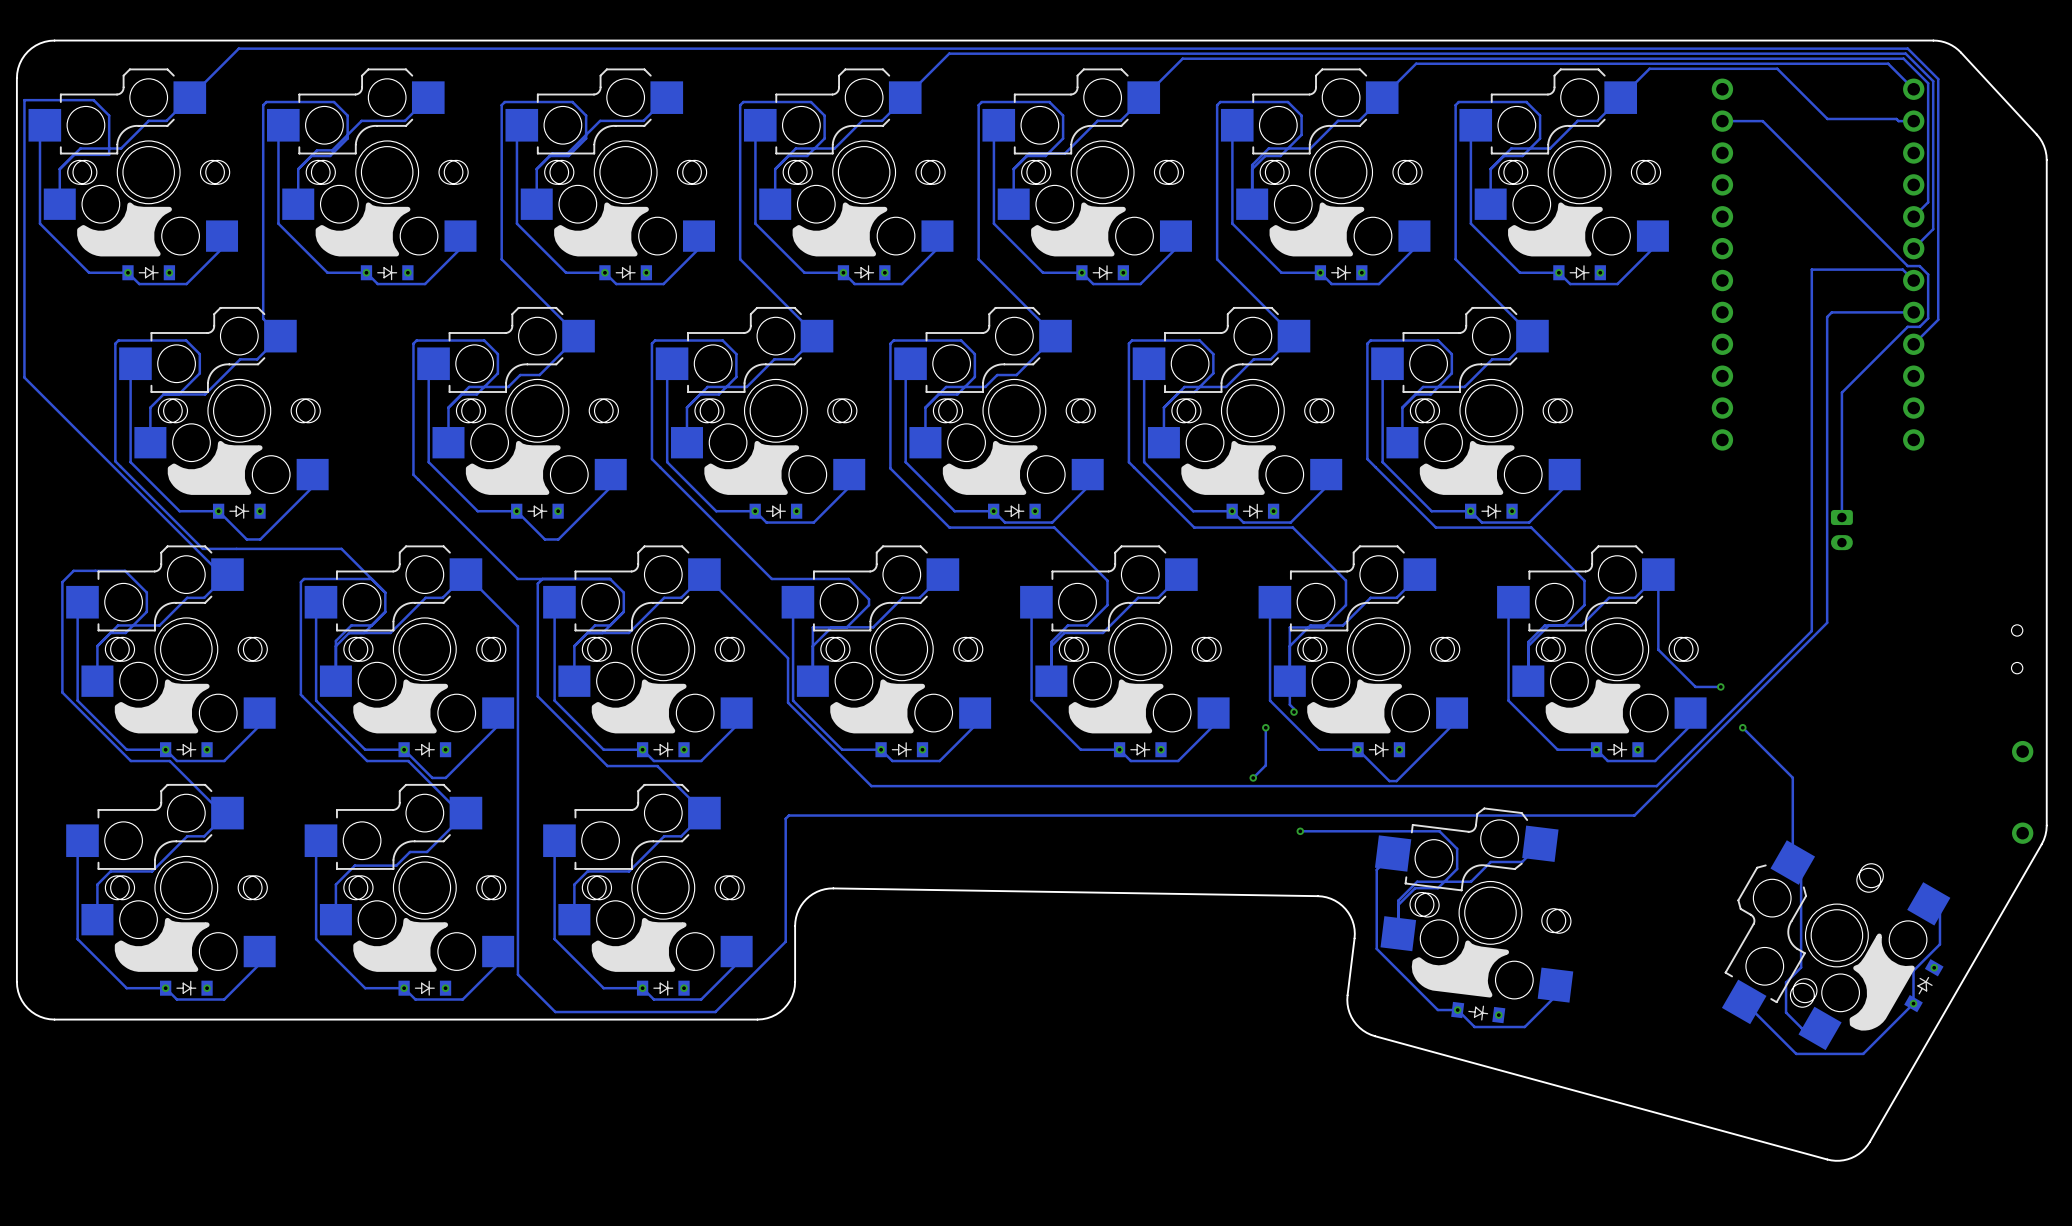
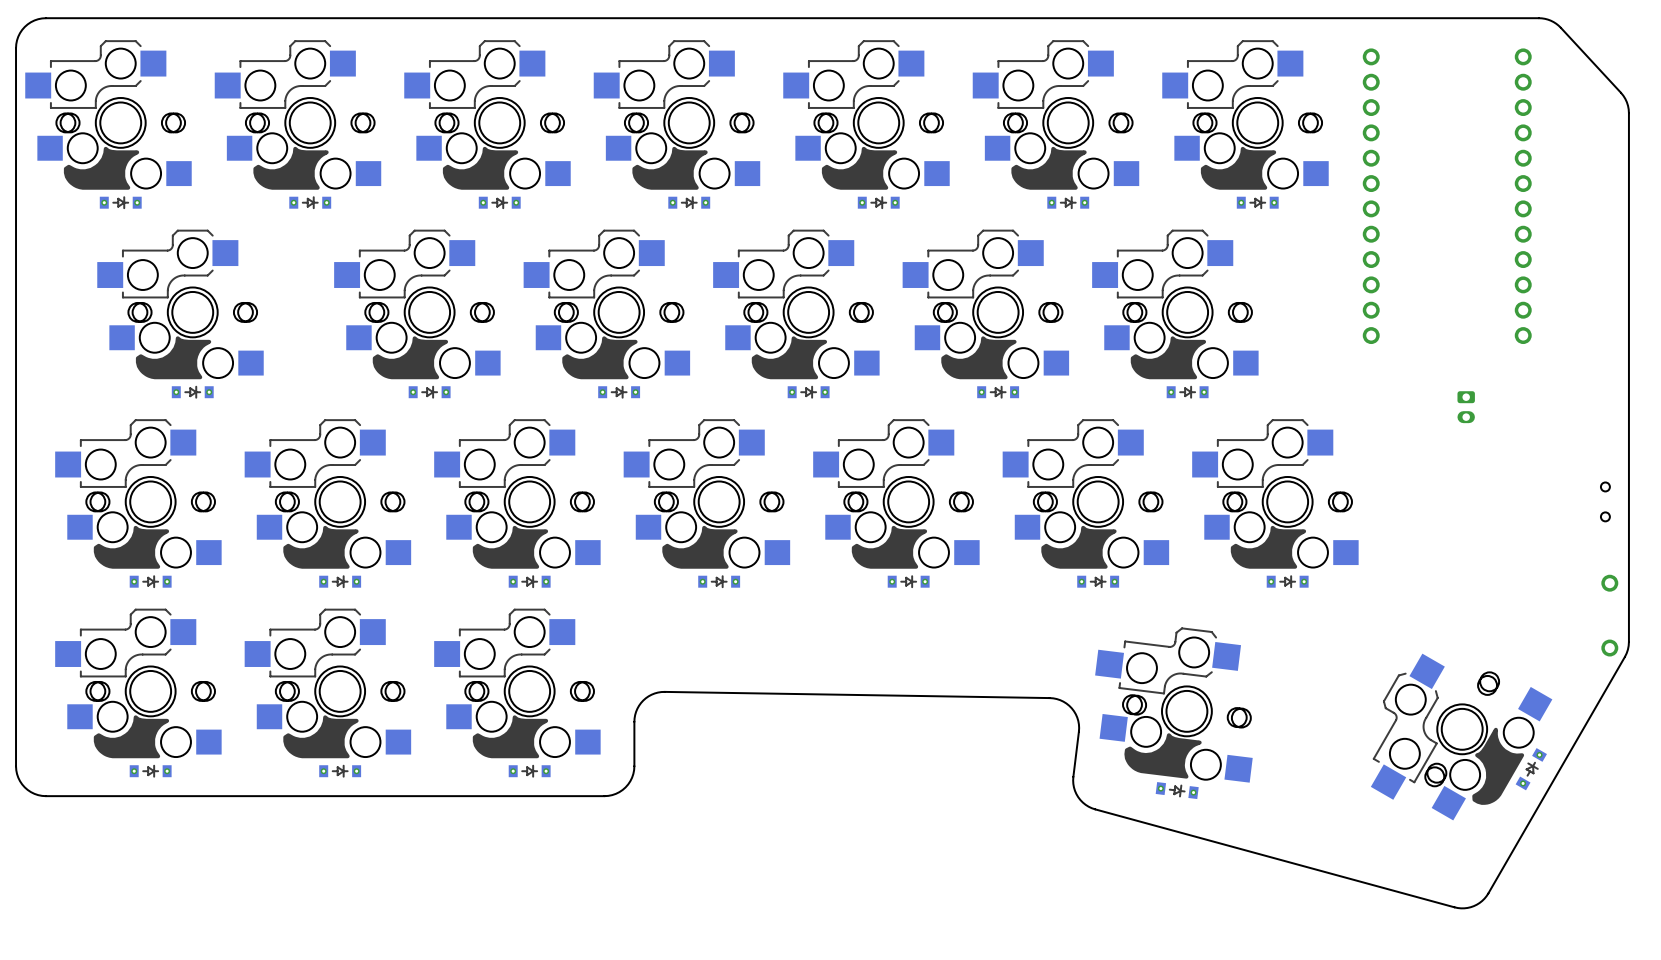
track: (1913, 89) (1888, 63) (1416, 63) (1358, 120) (1337, 120) (1310, 148) (1268, 148) (1252, 165) (1252, 204) -> none
track: (428, 97) (405, 120) (361, 120) (332, 150) (317, 150) (298, 169) (298, 204) -> none
track: (666, 97) (643, 120) (600, 120) (567, 153) (552, 153) (536, 169) (536, 204) -> none
track: (1722, 121) (1762, 121) (1907, 266) (1919, 266) (1928, 274) (1928, 318) (1919, 326) (1907, 326) (1841, 392) (1841, 517) -> none
track: (1913, 121) (1898, 121) (1896, 118) (1827, 118) (1777, 68) (1649, 68) (1597, 120) (1577, 120) (1550, 148) (1511, 148) (1490, 169) (1490, 204) -> none
track: (44, 125) (39, 130) (39, 223) (89, 272) (127, 272) (139, 284) (186, 284) (227, 243) -> none
track: (283, 125) (278, 130) (278, 223) (327, 272) (366, 272) (377, 284) (425, 284) (465, 243) -> none
track: (521, 125) (516, 130) (516, 223) (566, 272) (604, 272) (616, 284) (663, 284) (704, 243) -> none
track: (760, 125) (755, 130) (755, 223) (804, 272) (843, 272) (854, 284) (902, 284) (942, 243) -> none
track: (998, 125) (993, 130) (993, 223) (1042, 272) (1081, 272) (1093, 284) (1140, 284) (1181, 243) (1181, 236) -> none
track: (1237, 125) (1232, 130) (1232, 223) (1281, 272) (1320, 272) (1331, 284) (1378, 284) (1419, 243) -> none
track: (1475, 125) (1470, 130) (1470, 223) (1519, 272) (1558, 272) (1570, 284) (1617, 284) (1658, 243) -> none
track: (74, 154) (109, 154) (109, 115) (93, 100) (24, 100) (24, 377) (221, 574) (227, 574) (204, 597) (187, 597) (159, 625) (118, 625) (97, 646) (97, 681) -> none
track: (311, 156) (330, 156) (347, 138) (347, 115) (334, 102) (266, 102) (263, 105) (263, 318) (280, 336) (257, 359) (240, 359) (205, 394) (163, 394) (150, 407) (150, 442) -> none
track: (549, 156) (568, 156) (586, 138) (586, 115) (572, 102) (504, 102) (501, 105) (501, 259) (578, 336) (539, 375) (520, 375) (508, 386) (469, 386) (448, 407) (448, 442) -> none
track: (788, 156) (807, 156) (824, 138) (824, 115) (811, 102) (743, 102) (740, 105) (740, 259) (817, 336) (793, 359) (774, 359) (746, 386) (707, 386) (686, 407) (686, 442) -> none
track: (1026, 156) (1045, 156) (1063, 138) (1063, 115) (1049, 102) (981, 102) (978, 105) (978, 259) (1055, 336) (1016, 375) (997, 375) (985, 386) (946, 386) (925, 407) (925, 442) -> none
track: (1503, 156) (1522, 156) (1540, 138) (1540, 115) (1526, 102) (1458, 102) (1455, 105) (1455, 259) (1532, 336) (1509, 359) (1492, 359) (1464, 386) (1423, 386) (1402, 407) (1402, 442) -> none
track: (1252, 169) (1265, 156) (1280, 156) (1301, 134) (1301, 115) (1287, 102) (1220, 102) (1217, 105) (1217, 259) (1293, 336) (1270, 359) (1253, 359) (1226, 386) (1184, 386) (1163, 407) (1163, 442) -> none
track: (59, 204) (59, 169) (80, 148) (121, 148) (148, 120) (166, 120) (238, 48) (1907, 48) (1938, 79) (1938, 319) (1913, 344) -> none
track: (775, 204) (775, 169) (795, 148) (834, 148) (862, 120) (882, 120) (949, 53) (1905, 53) (1933, 81) (1933, 229) (1913, 248) -> none
track: (1013, 204) (1013, 169) (1029, 153) (1064, 153) (1097, 120) (1120, 120) (1182, 58) (1903, 58) (1928, 83) (1928, 202) (1913, 216) -> none
track: (1913, 280) (1902, 269) (1811, 269) (1811, 631) (1656, 786) (871, 786) (788, 702) (788, 658) (704, 574) (681, 597) (664, 597) (629, 632) (587, 632) -> none
track: (1913, 312) (1831, 312) (1827, 317) (1827, 622) (1634, 815) (788, 815) (785, 818) (785, 941) (715, 1012) (555, 1012) (517, 974) (517, 626) (465, 574) (442, 597) (425, 597) (390, 632) (349, 632) (335, 646) -> none
track: (135, 363) (130, 368) (130, 462) (179, 511) (218, 511) (246, 539) (260, 539) (317, 481) -> none
track: (433, 363) (428, 368) (428, 462) (477, 511) (516, 511) (544, 539) (558, 539) (615, 481) -> none
track: (672, 363) (667, 368) (667, 462) (716, 511) (755, 511) (766, 522) (813, 522) (854, 481) -> none
track: (910, 363) (905, 368) (905, 462) (954, 511) (993, 511) (1004, 522) (1052, 522) (1092, 481) -> none
track: (1149, 363) (1144, 368) (1144, 462) (1193, 511) (1232, 511) (1243, 522) (1290, 522) (1331, 481) -> none
track: (1387, 363) (1382, 368) (1382, 462) (1431, 511) (1470, 511) (1481, 522) (1529, 522) (1569, 481) -> none
track: (1179, 391) (1194, 391) (1213, 373) (1213, 354) (1199, 340) (1132, 340) (1128, 343) (1128, 462) (1194, 527) (1292, 527) (1345, 580) (1345, 605) (1323, 627) (1289, 627) (1289, 704) (1294, 708) (1294, 712) -> none
track: (178, 394) (199, 373) (199, 354) (186, 340) (118, 340) (115, 343) (115, 461) (202, 548) (341, 548) (385, 592) (385, 611) (364, 632) -> none
track: (461, 394) (476, 394) (497, 373) (497, 354) (484, 340) (416, 340) (413, 343) (413, 474) (517, 578) (610, 578) (623, 592) (623, 611) (602, 632) -> none
track: (700, 394) (718, 394) (736, 377) (736, 354) (722, 340) (655, 340) (651, 343) (651, 459) (771, 578) (848, 578) (869, 599) (869, 605) (846, 627) (812, 627) (812, 681) -> none
track: (938, 394) (957, 394) (974, 377) (974, 354) (961, 340) (893, 340) (890, 343) (890, 468) (949, 527) (1054, 527) (1107, 580) (1107, 605) (1087, 625) (1067, 625) (1051, 642) (1051, 681) -> none
track: (1415, 394) (1430, 394) (1451, 373) (1451, 354) (1438, 340) (1370, 340) (1367, 343) (1367, 459) (1435, 527) (1531, 527) (1584, 580) (1584, 605) (1564, 625) -> none
track: (942, 574) (919, 597) (902, 597) (873, 627) (831, 627) (812, 646) -> none
track: (1181, 574) (1158, 597) (1138, 597) (1102, 632) (1064, 632) (1051, 646) -> none
track: (1419, 574) (1396, 597) (1370, 597) (1342, 625) (1310, 625) (1289, 646) -> none
track: (371, 578) (304, 578) (300, 582) (300, 694) (367, 761) (408, 761) (460, 813) (465, 813) (427, 851) (410, 851) (396, 865) (354, 865) (335, 884) (335, 919) -> none
track: (542, 578) (537, 583) (537, 696) (607, 766) (657, 766) (704, 813) (681, 836) (664, 836) (629, 871) (587, 871) (574, 884) (574, 919) -> none
track: (82, 602) (77, 607) (77, 700) (126, 749) (165, 749) (176, 761) (224, 761) (264, 720) -> none
track: (320, 602) (316, 607) (316, 700) (365, 749) (404, 749) (432, 777) (445, 777) (503, 720) -> none
track: (559, 602) (554, 607) (554, 700) (603, 749) (642, 749) (653, 761) (701, 761) (741, 720) -> none
track: (797, 602) (793, 607) (793, 700) (842, 749) (881, 749) (892, 761) (939, 761) (980, 720) -> none
track: (1036, 602) (1031, 607) (1031, 700) (1080, 749) (1119, 749) (1130, 761) (1178, 761) (1218, 720) -> none
track: (1274, 602) (1270, 607) (1270, 700) (1319, 749) (1358, 749) (1389, 781) (1396, 781) (1457, 720) -> none
track: (1513, 602) (1508, 607) (1508, 700) (1557, 749) (1596, 749) (1607, 761) (1655, 761) (1695, 720) -> none
track: (371, 625) (351, 625) (335, 640) (335, 681) -> none
track: (610, 625) (595, 625) (574, 646) (574, 681) -> none
track: (1548, 625) (1528, 646) -> none
track: (110, 632) (125, 632) (146, 611) (146, 592) (125, 570) (73, 570) (62, 582) (62, 692) (130, 761) (169, 761) (221, 813) (227, 813) (204, 836) (187, 836) (152, 871) (110, 871) (97, 884) (97, 919) -> none
track: (1528, 681) (1528, 642) (1544, 625) (1581, 625) (1609, 597) (1635, 597) (1658, 574) (1658, 649) (1695, 686) (1720, 686) -> none
via: (1720, 686) -> none
via: (1294, 712) -> none
track: (1265, 727) (1265, 765) (1253, 777) -> none
via: (1265, 727) -> none
track: (1742, 727) (1792, 777) (1792, 862) (1801, 870) (1801, 967) (1786, 982) (1786, 1012) (1801, 1028) (1820, 1028) -> none
via: (1742, 727) -> none
via: (1253, 777) -> none
track: (1300, 831) (1439, 831) (1457, 848) (1457, 869) (1438, 888) (1415, 888) (1398, 905) -> none
via: (1300, 831) -> none
track: (82, 840) (77, 845) (77, 939) (126, 988) (165, 988) (176, 999) (224, 999) (264, 958) -> none
track: (320, 840) (316, 845) (316, 939) (365, 988) (404, 988) (415, 999) (462, 999) (503, 958) -> none
track: (559, 840) (554, 845) (554, 939) (603, 988) (642, 988) (653, 999) (701, 999) (741, 958) -> none
track: (1540, 843) (1522, 861) (1490, 861) (1471, 881) (1417, 881) (1398, 900) (1398, 933) -> none
track: (1393, 853) (1376, 869) (1376, 948) (1437, 1010) (1457, 1010) (1474, 1027) (1524, 1027) (1560, 991) -> none
track: (1939, 906) (1939, 944) (1913, 970) (1913, 1003) (1863, 1053) (1796, 1053) (1744, 1001) -> none

